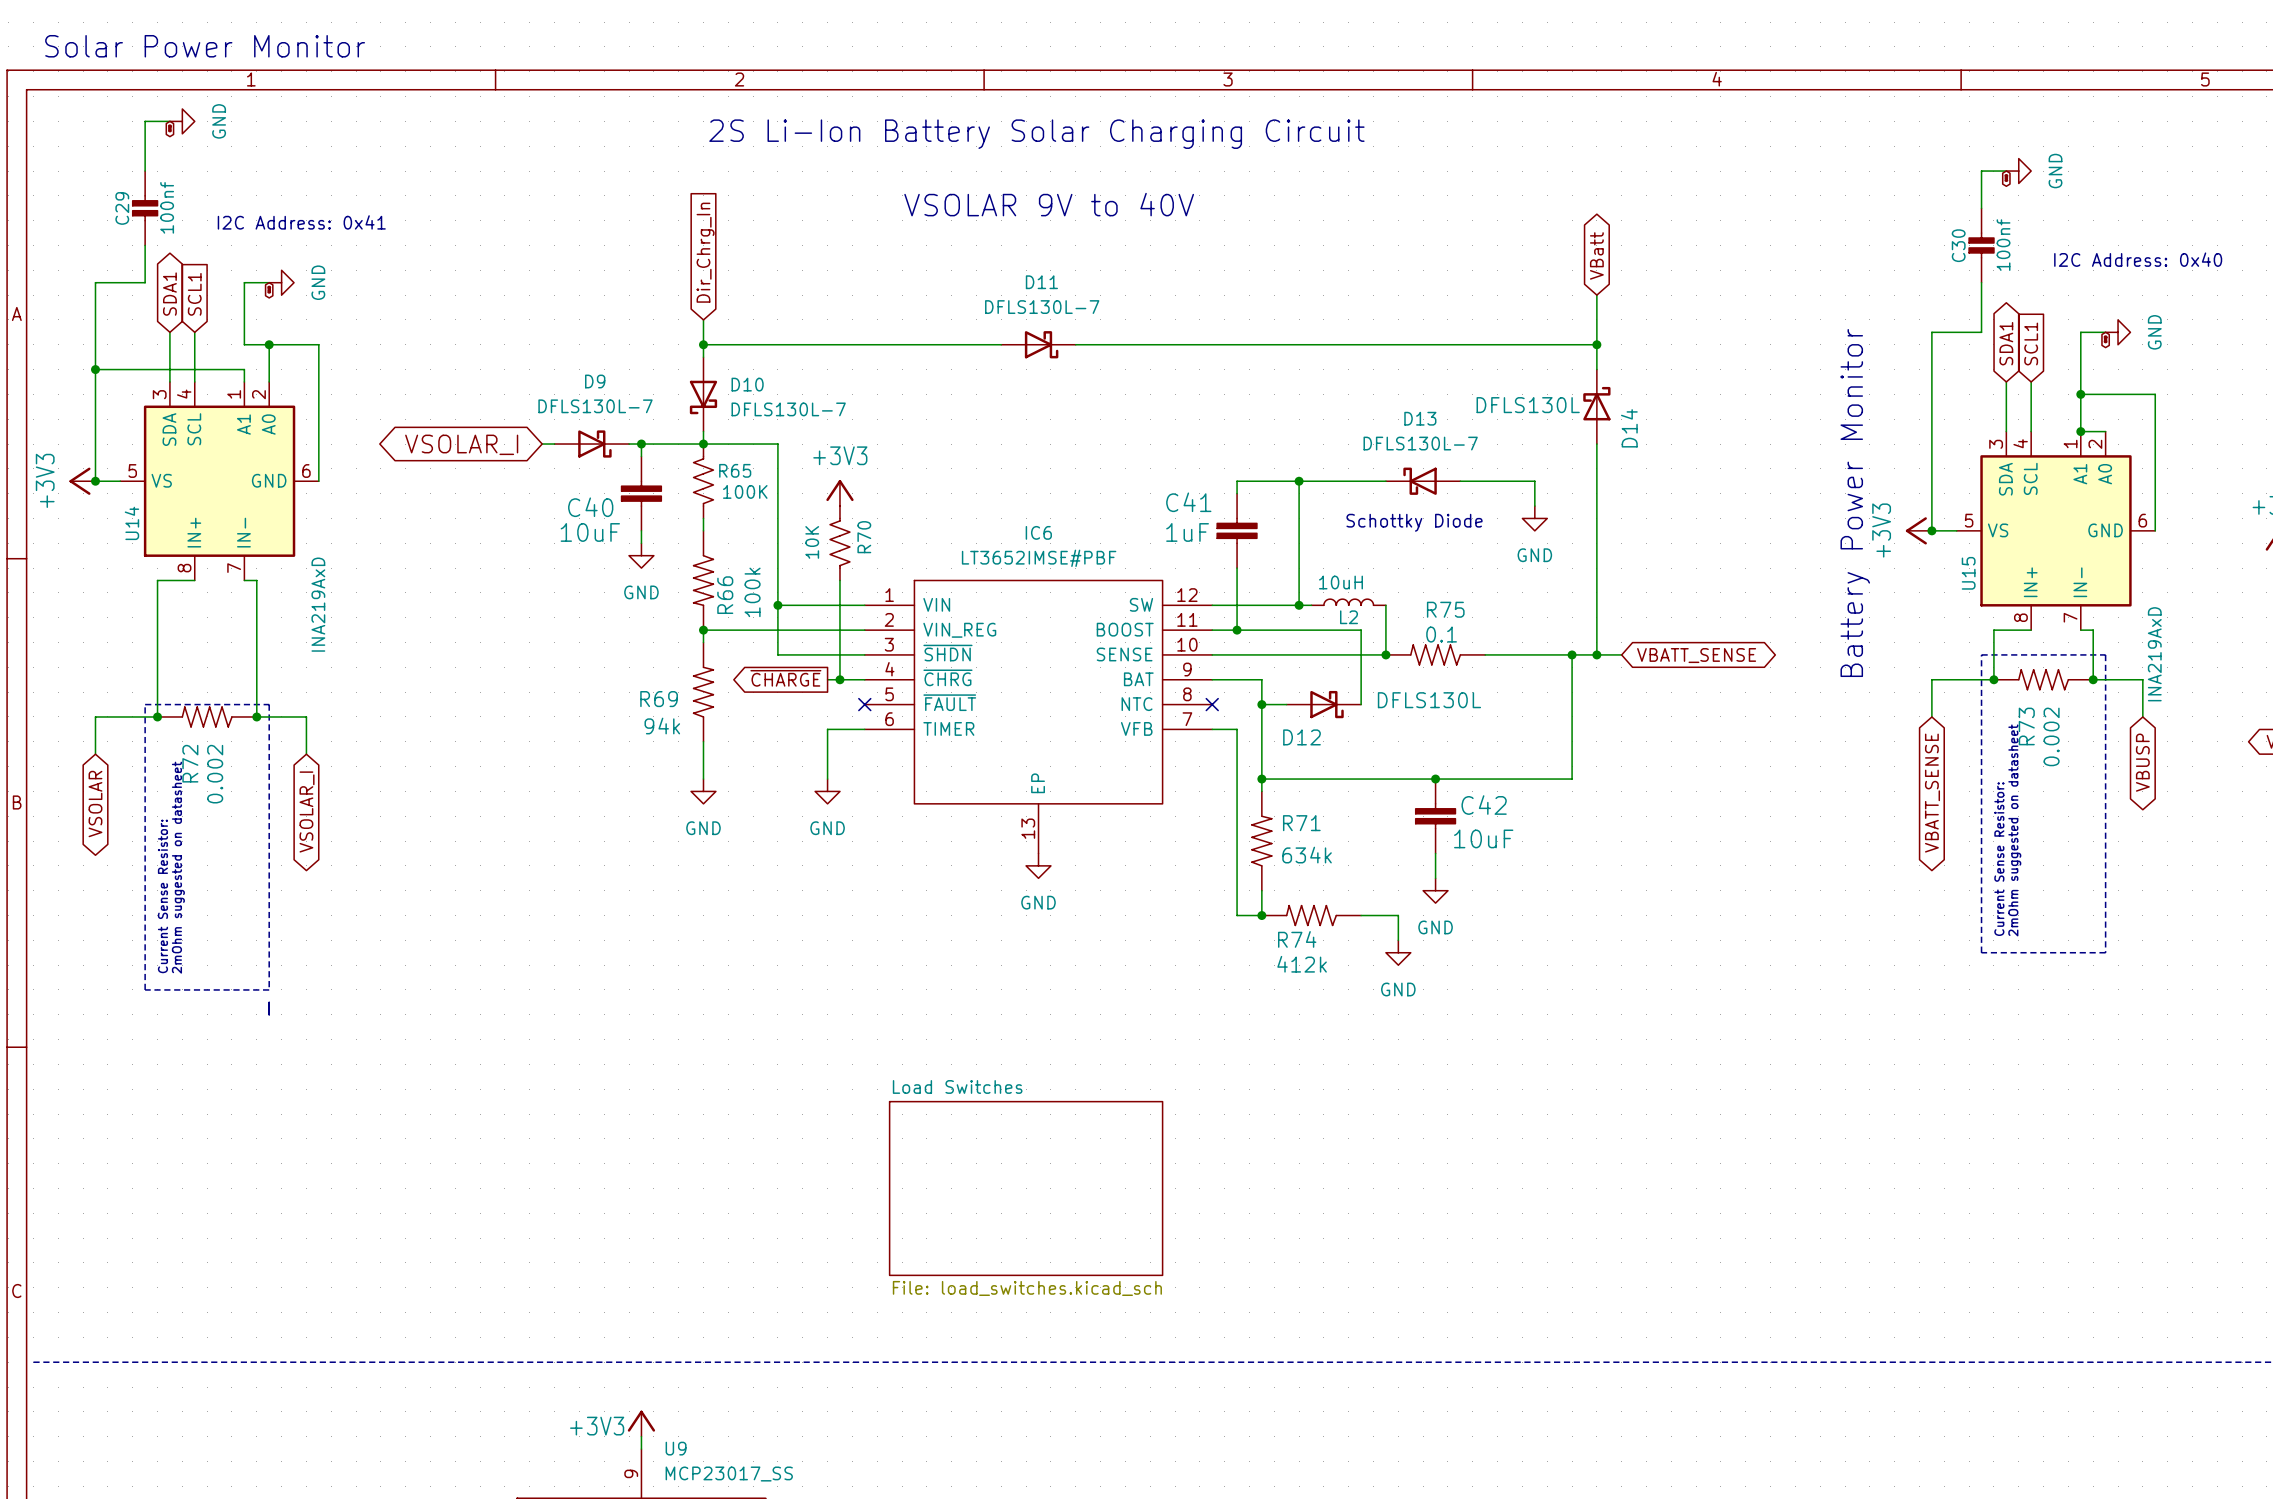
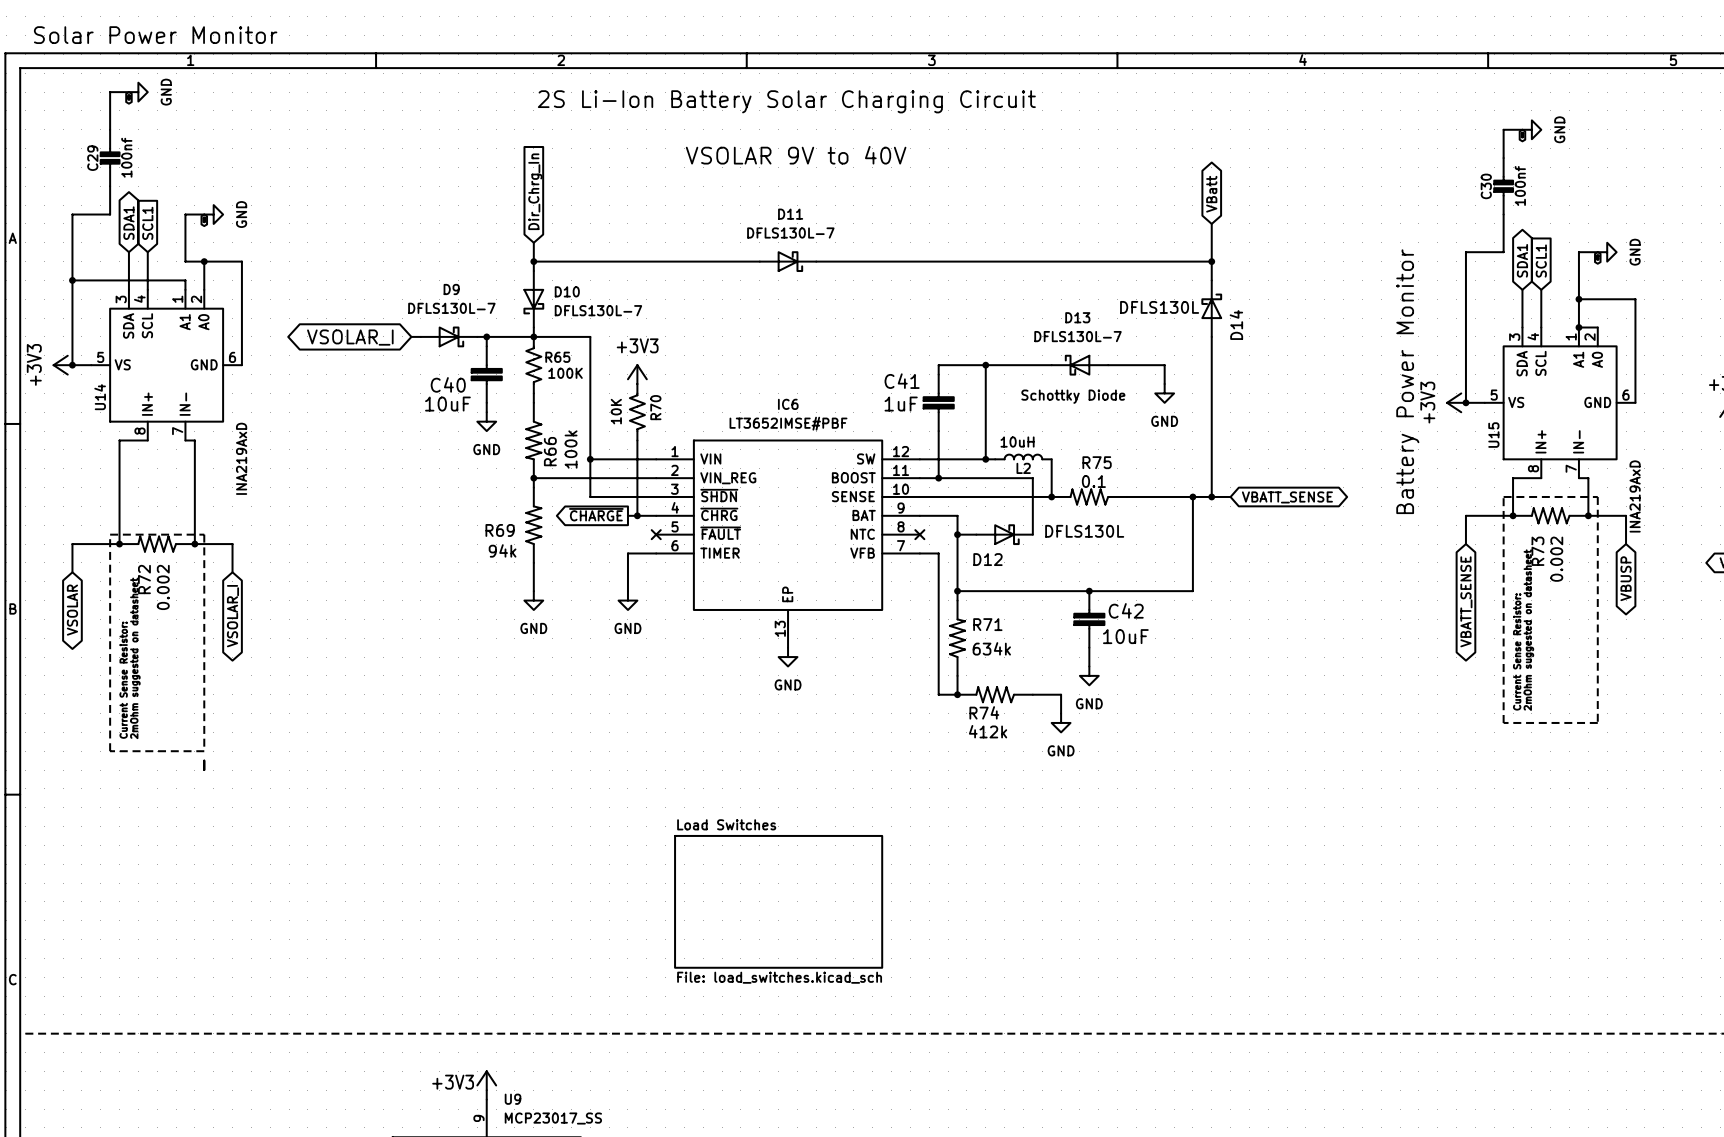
text: I2C Address: 0x41 (301, 222) -> none
text: I2C Address: 0x40 (2138, 259) -> none

